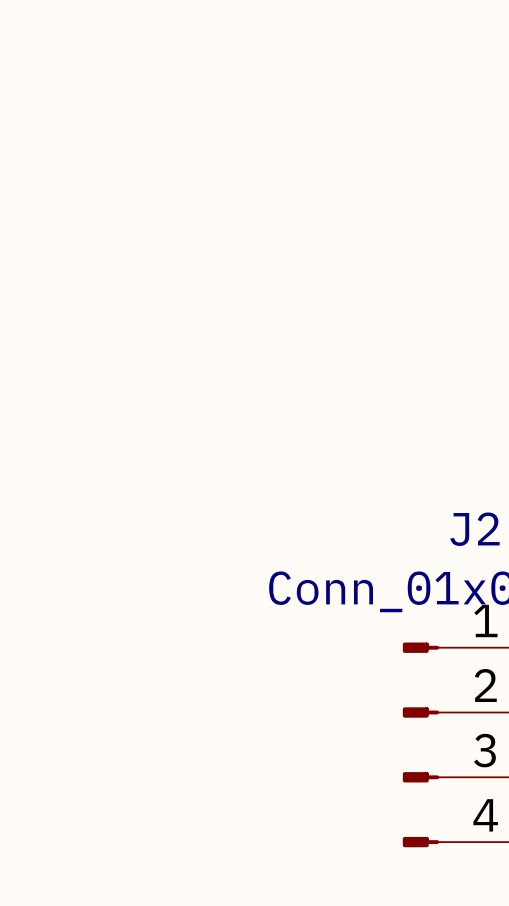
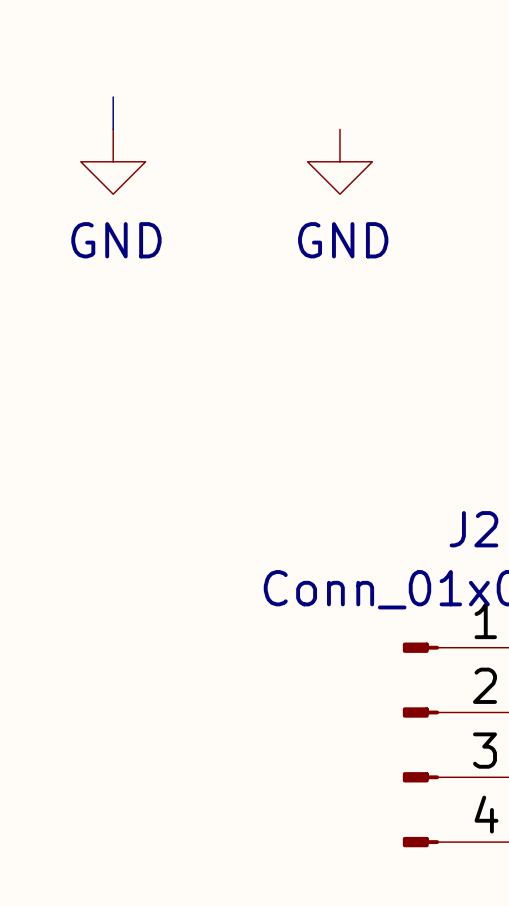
wire: none -> (113, 97) (113, 129)
power symbol: none -> GND (113, 161)
power symbol: none -> GND (339, 161)

